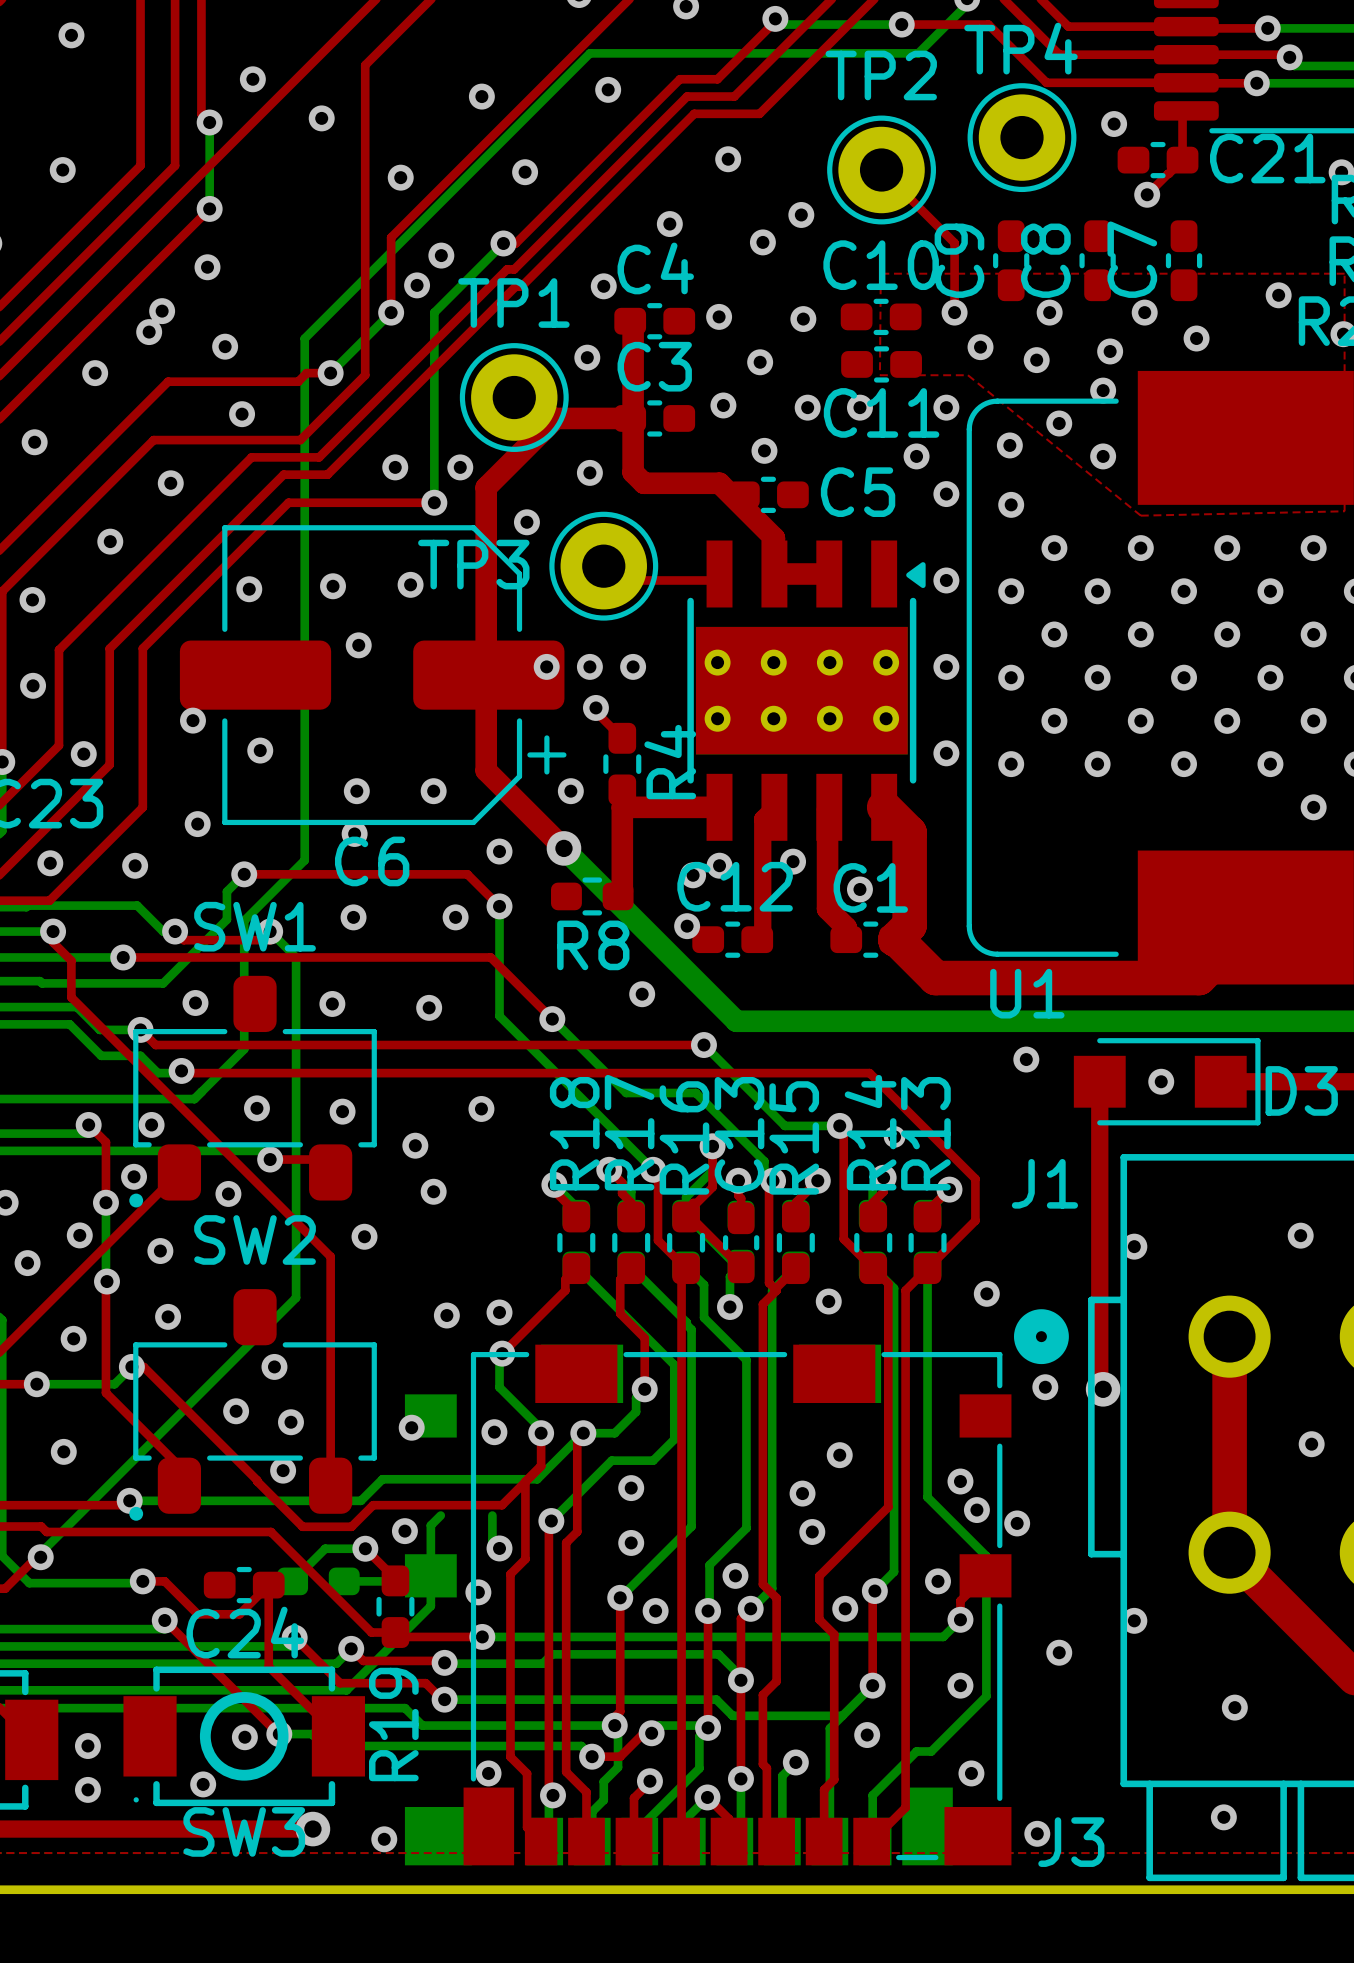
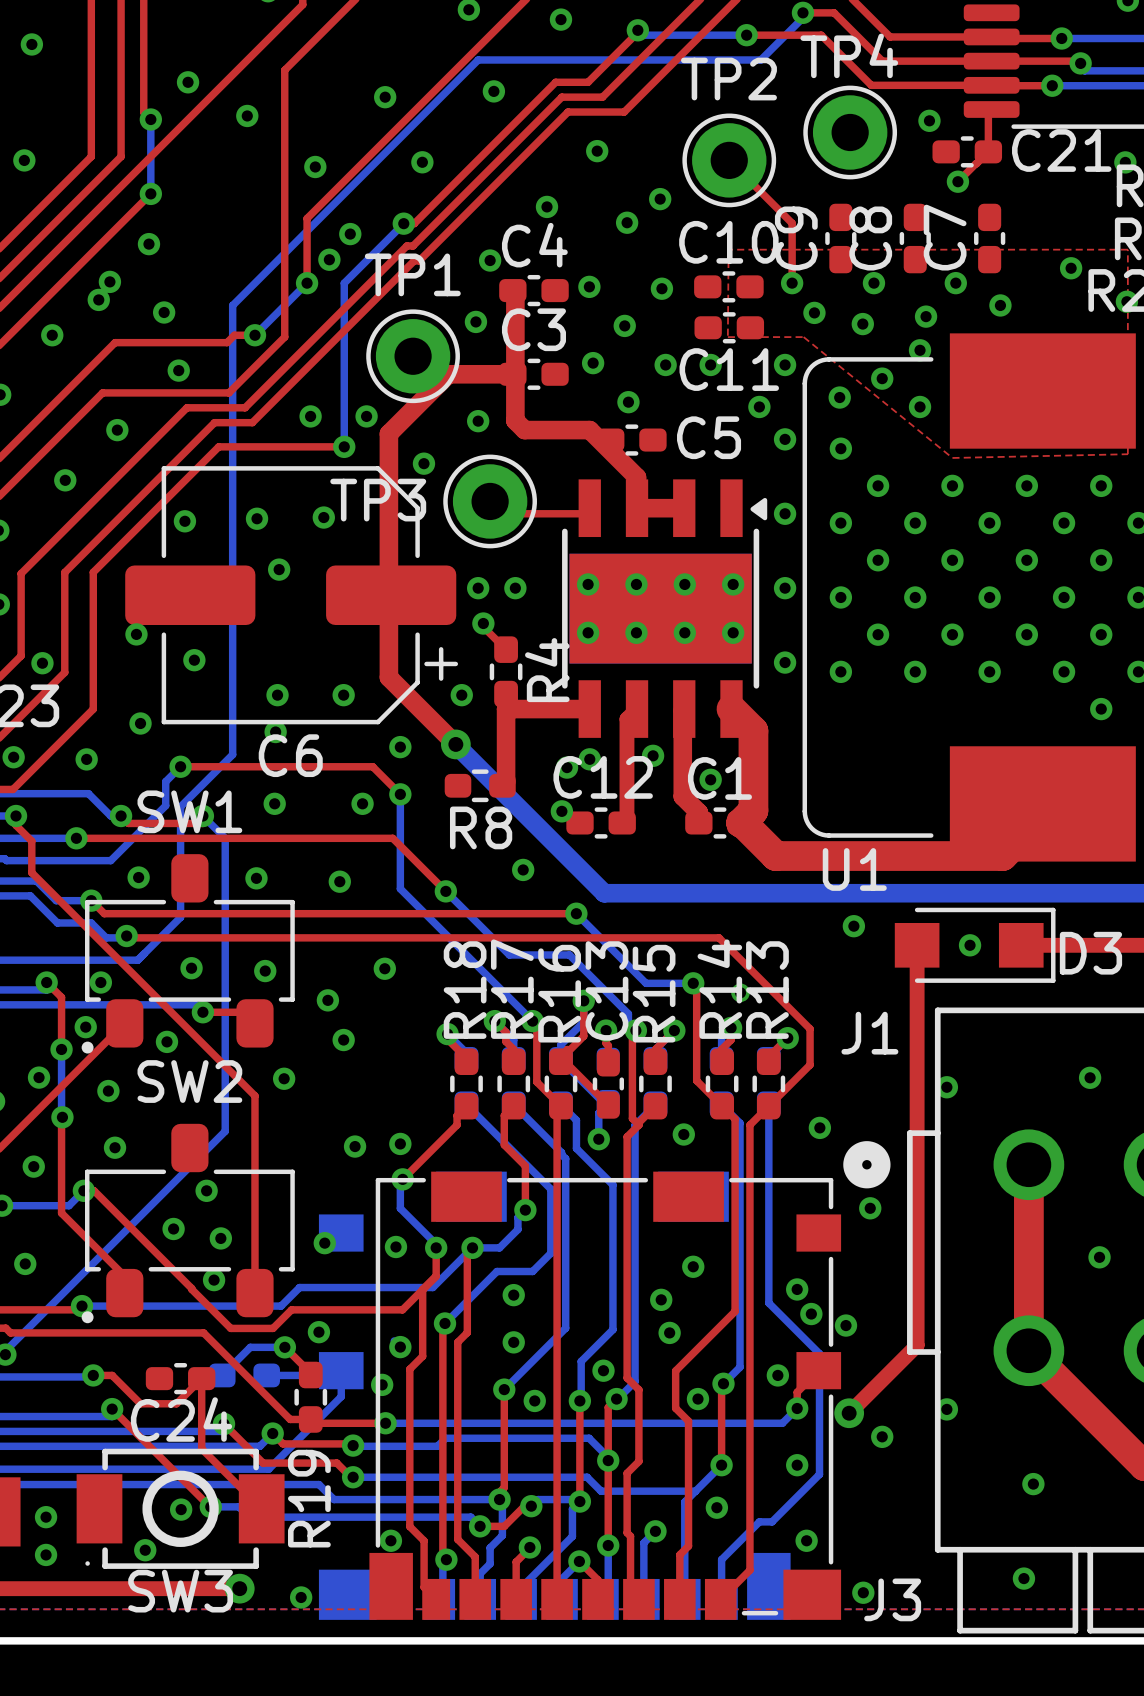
via: (546, 666) -> none
top track: none -> (917, 1205) (917, 1345) (849, 1413)
via position: (1103, 1389) -> (849, 1413)
bottom track: (440, 1515) (430, 1525) (430, 1575) -> none
bottom track: (492, 1515) (492, 1541) -> none

